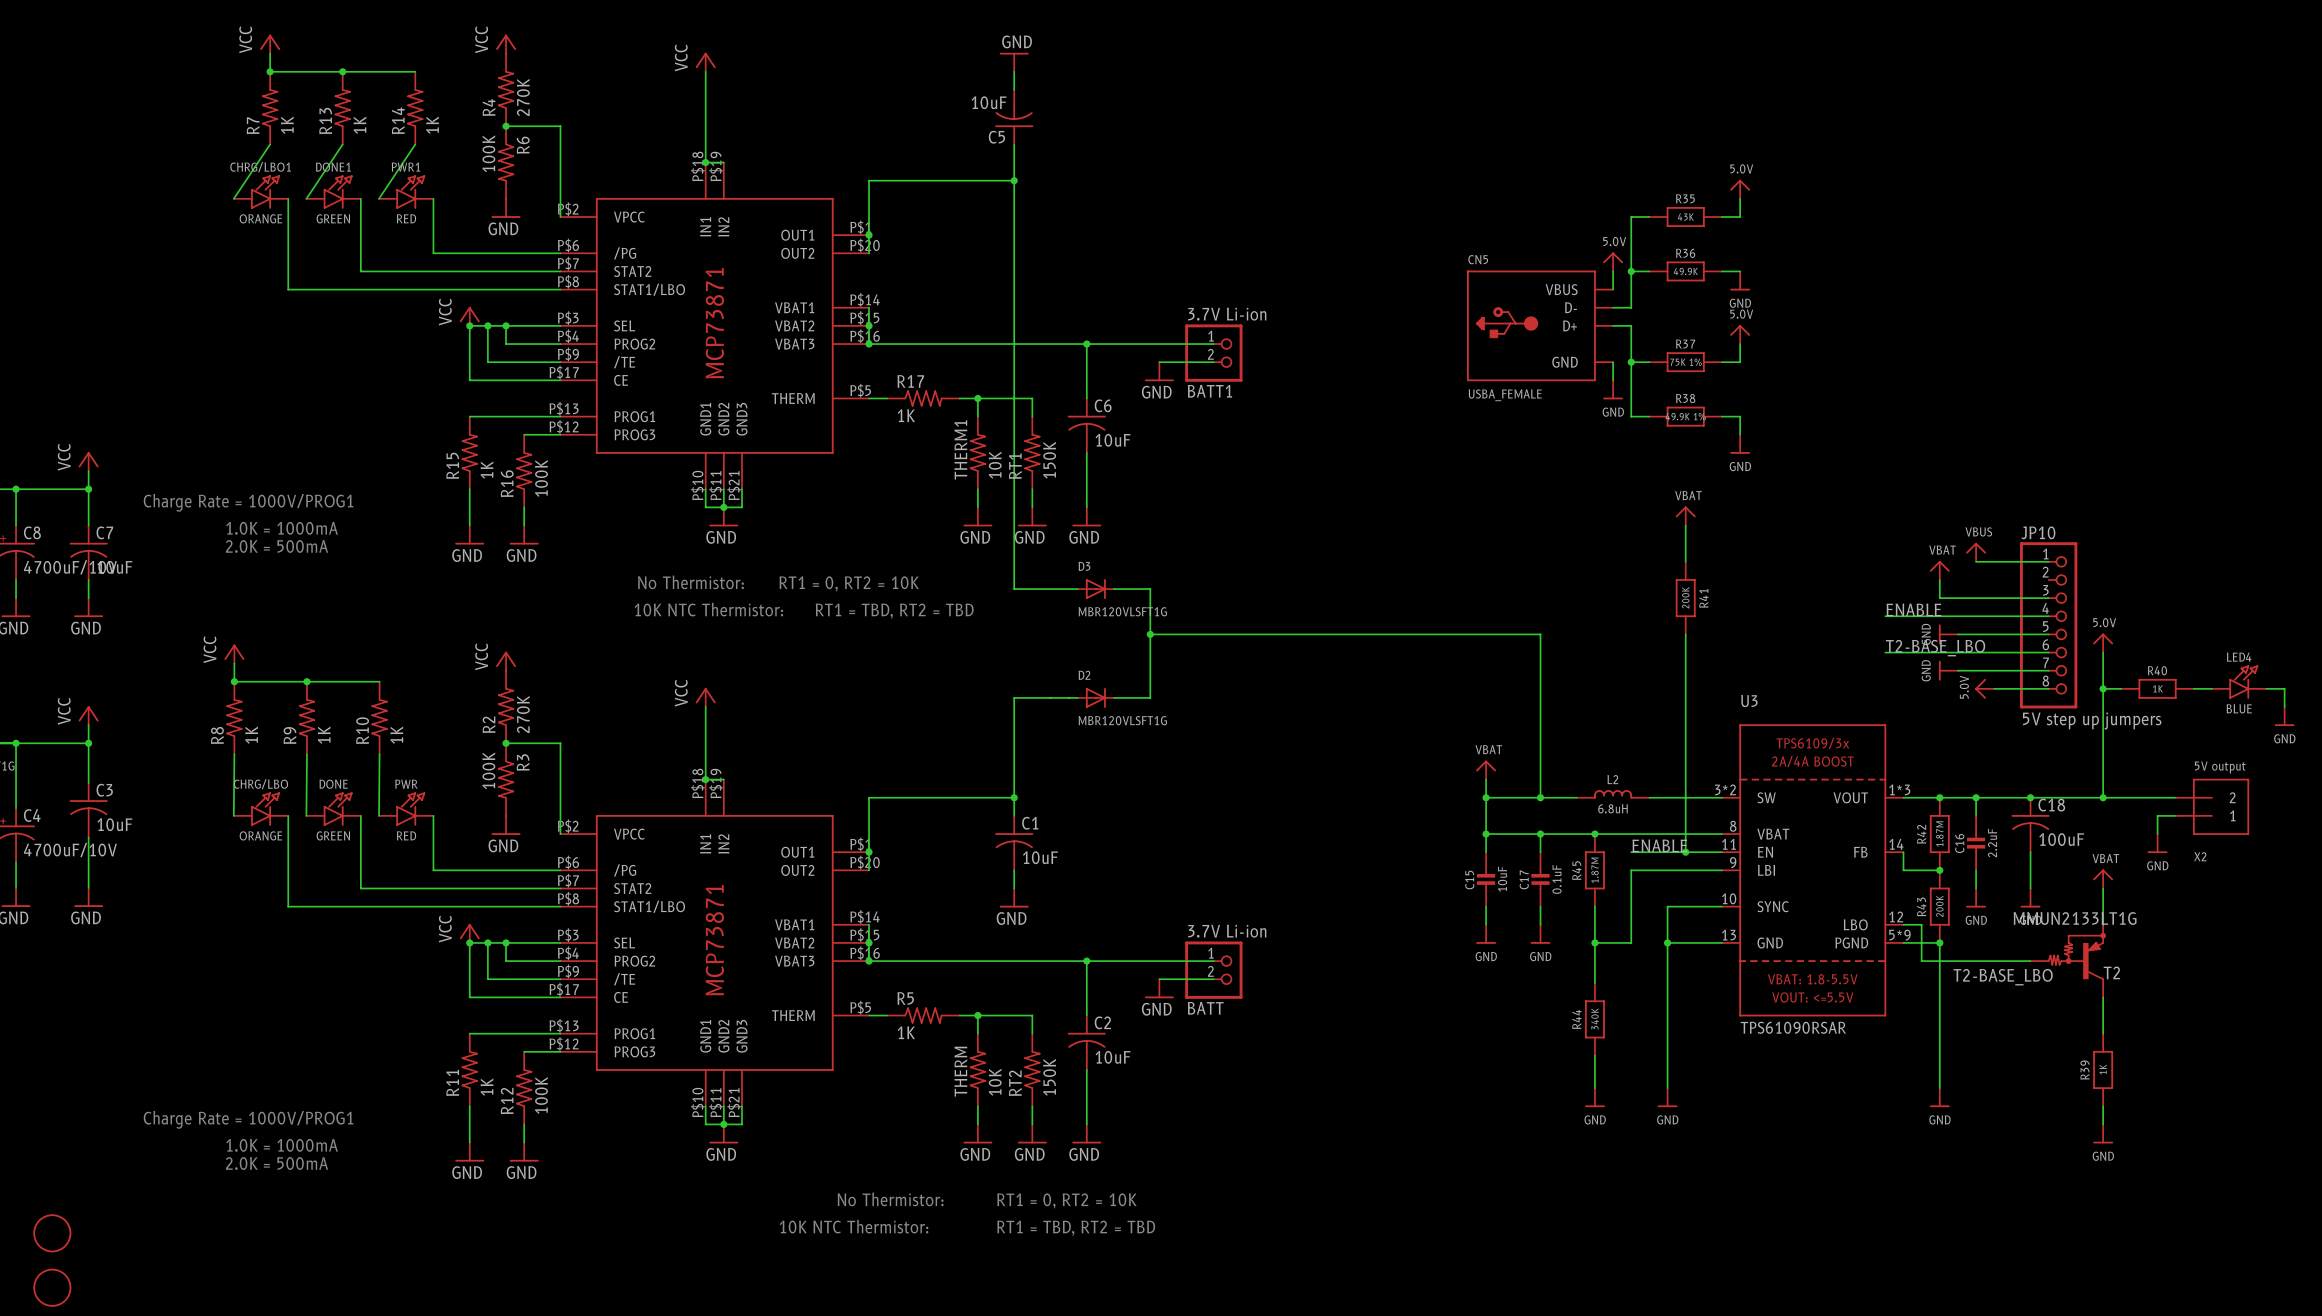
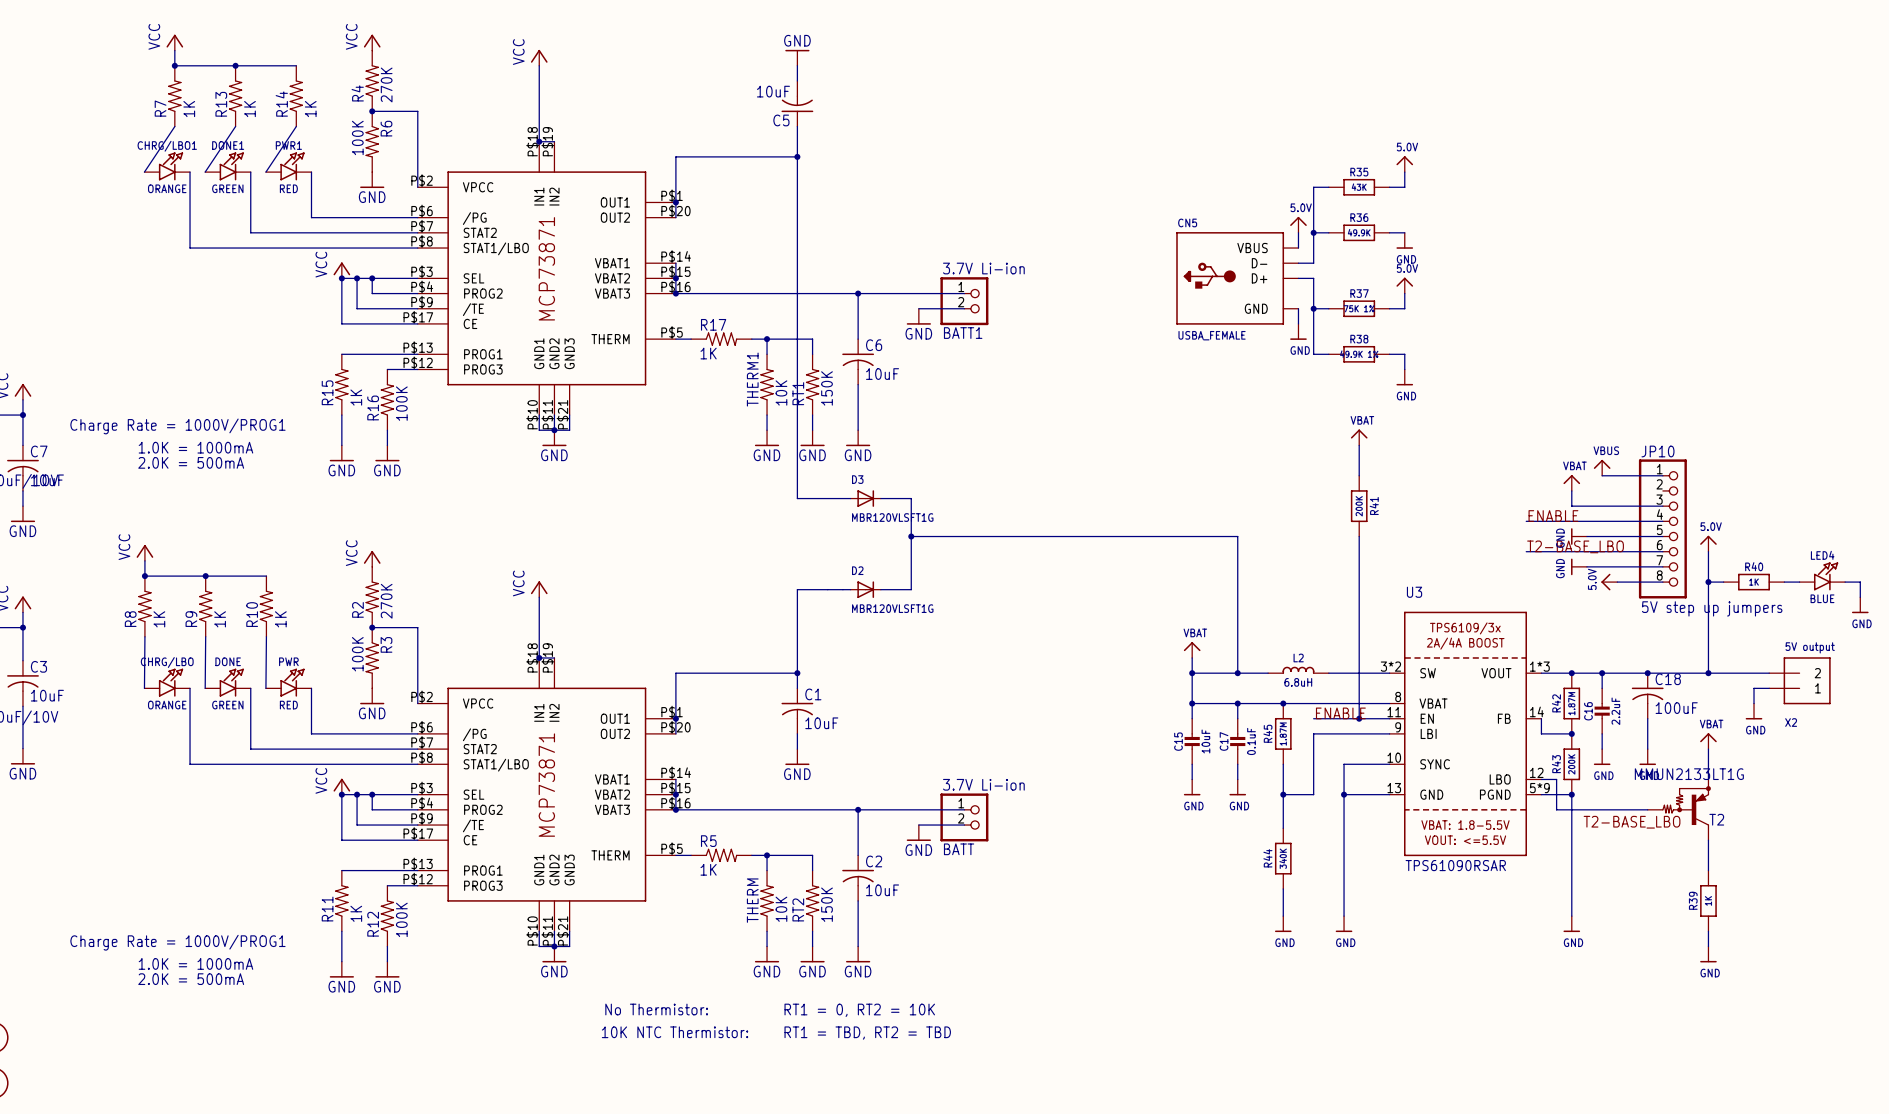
text: No Thermistor: (690, 582) -> none
text: RT1 = 0, RT2 = 10K (849, 583) -> none
text: 10K NTC Thermistor: (708, 609) -> none
text: RT1 = TBD, RT2 = TBD (894, 611) -> none
text position: No Thermistor: (890, 1199) -> No Thermistor: (656, 1009)

